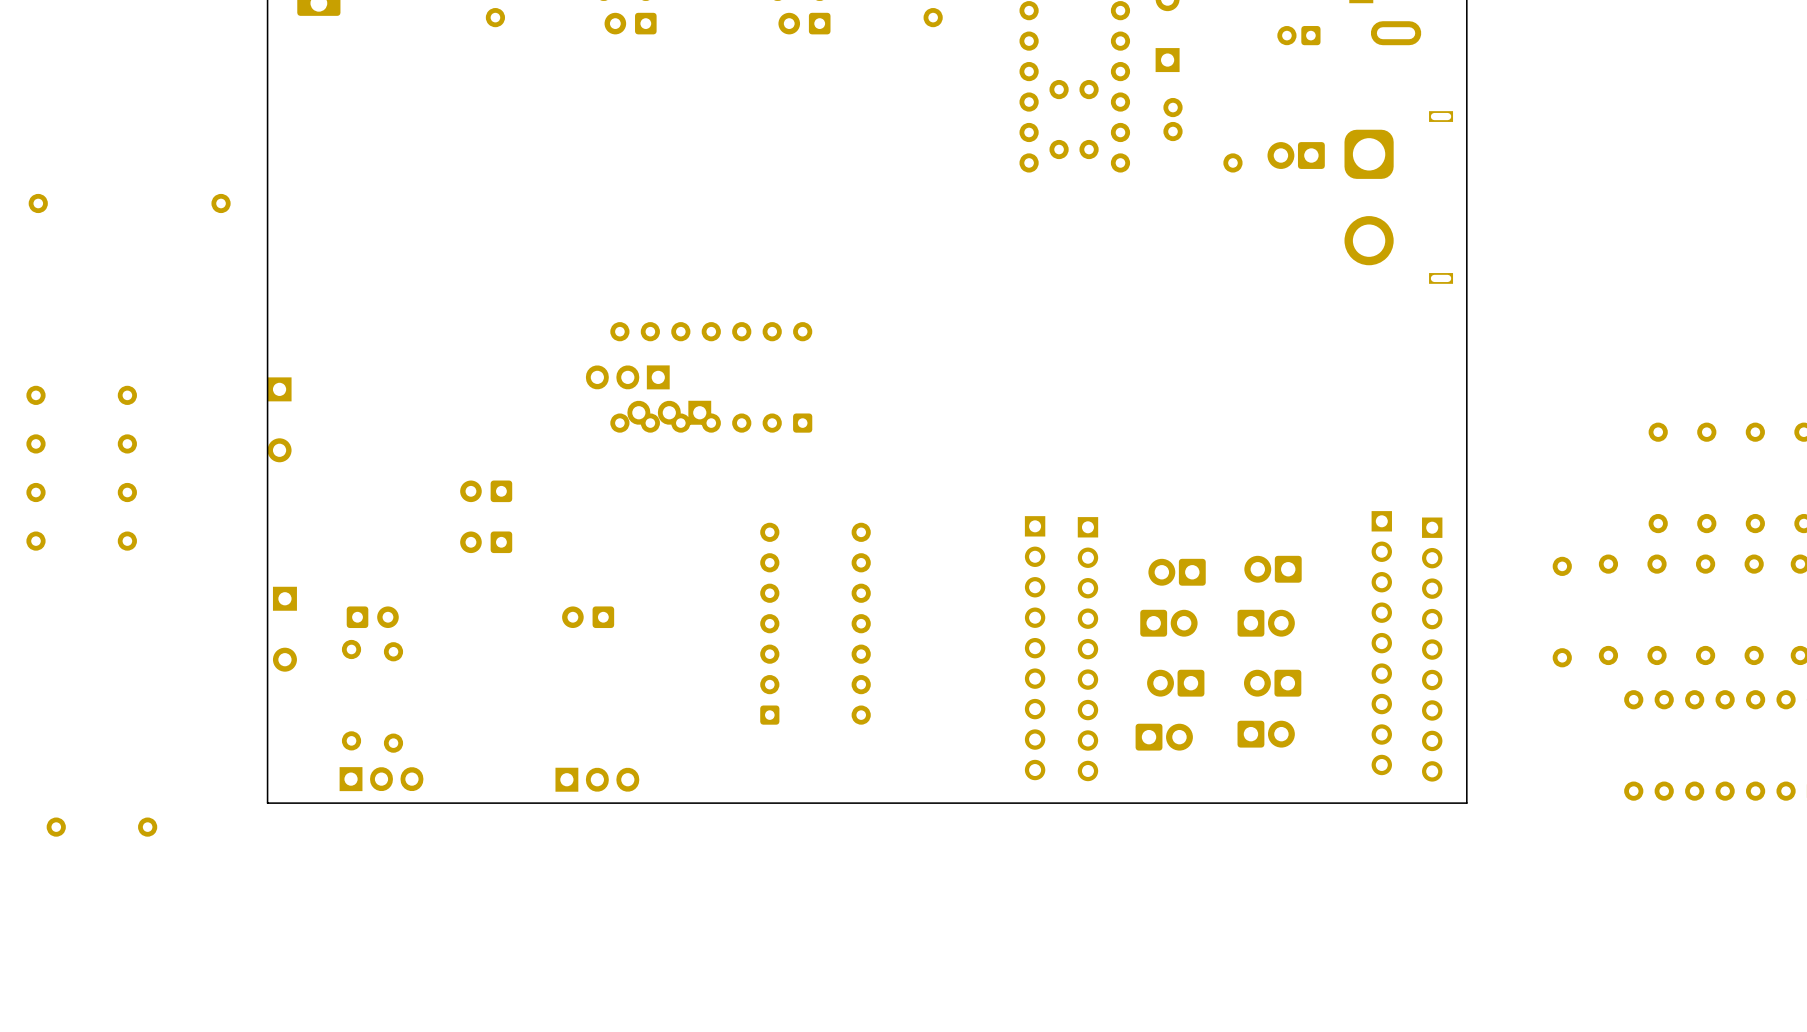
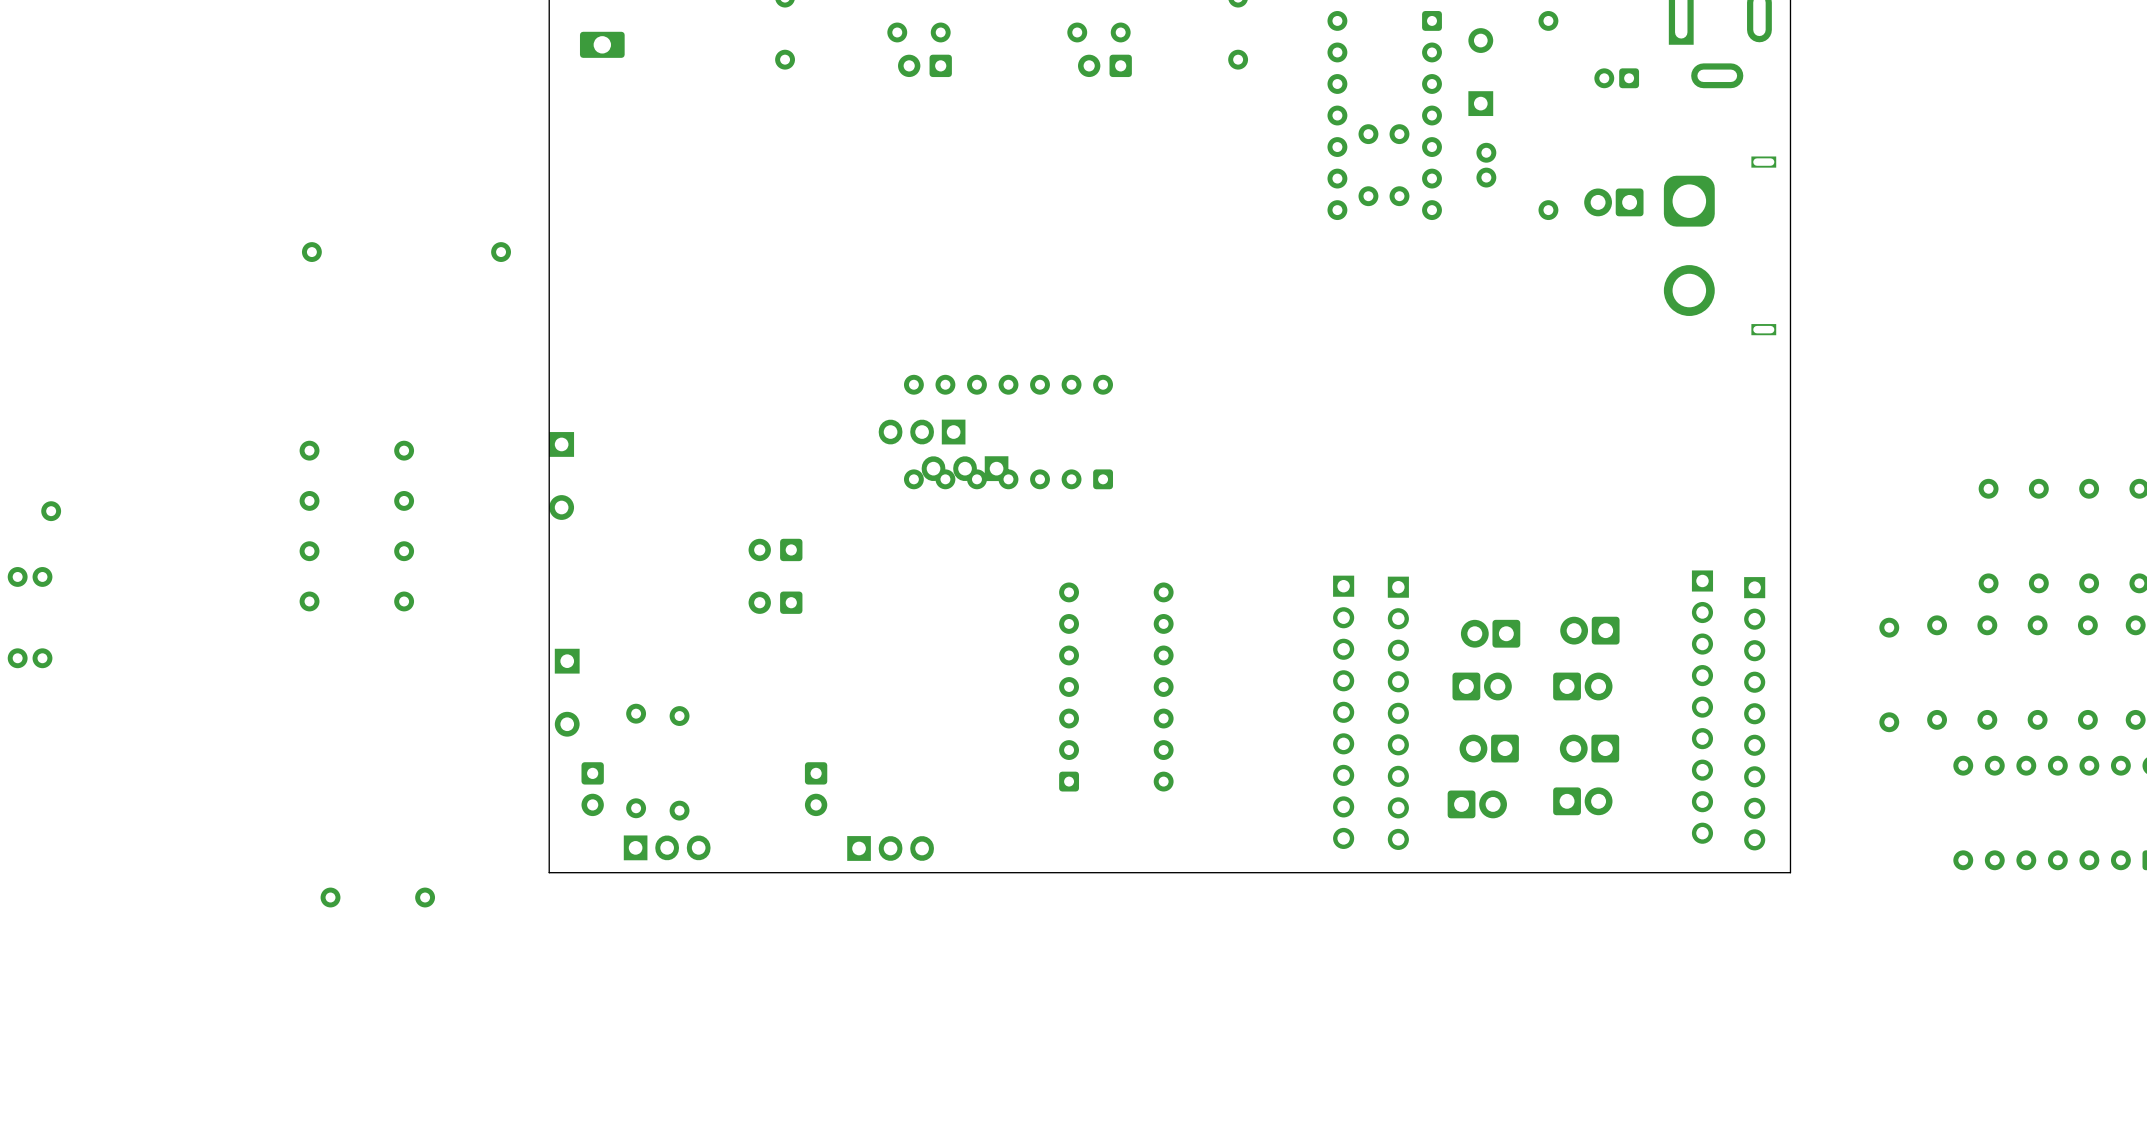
part: (372, 617) -> none
part: (588, 617) -> none
part: none -> (592, 789)
part: none -> (816, 789)

